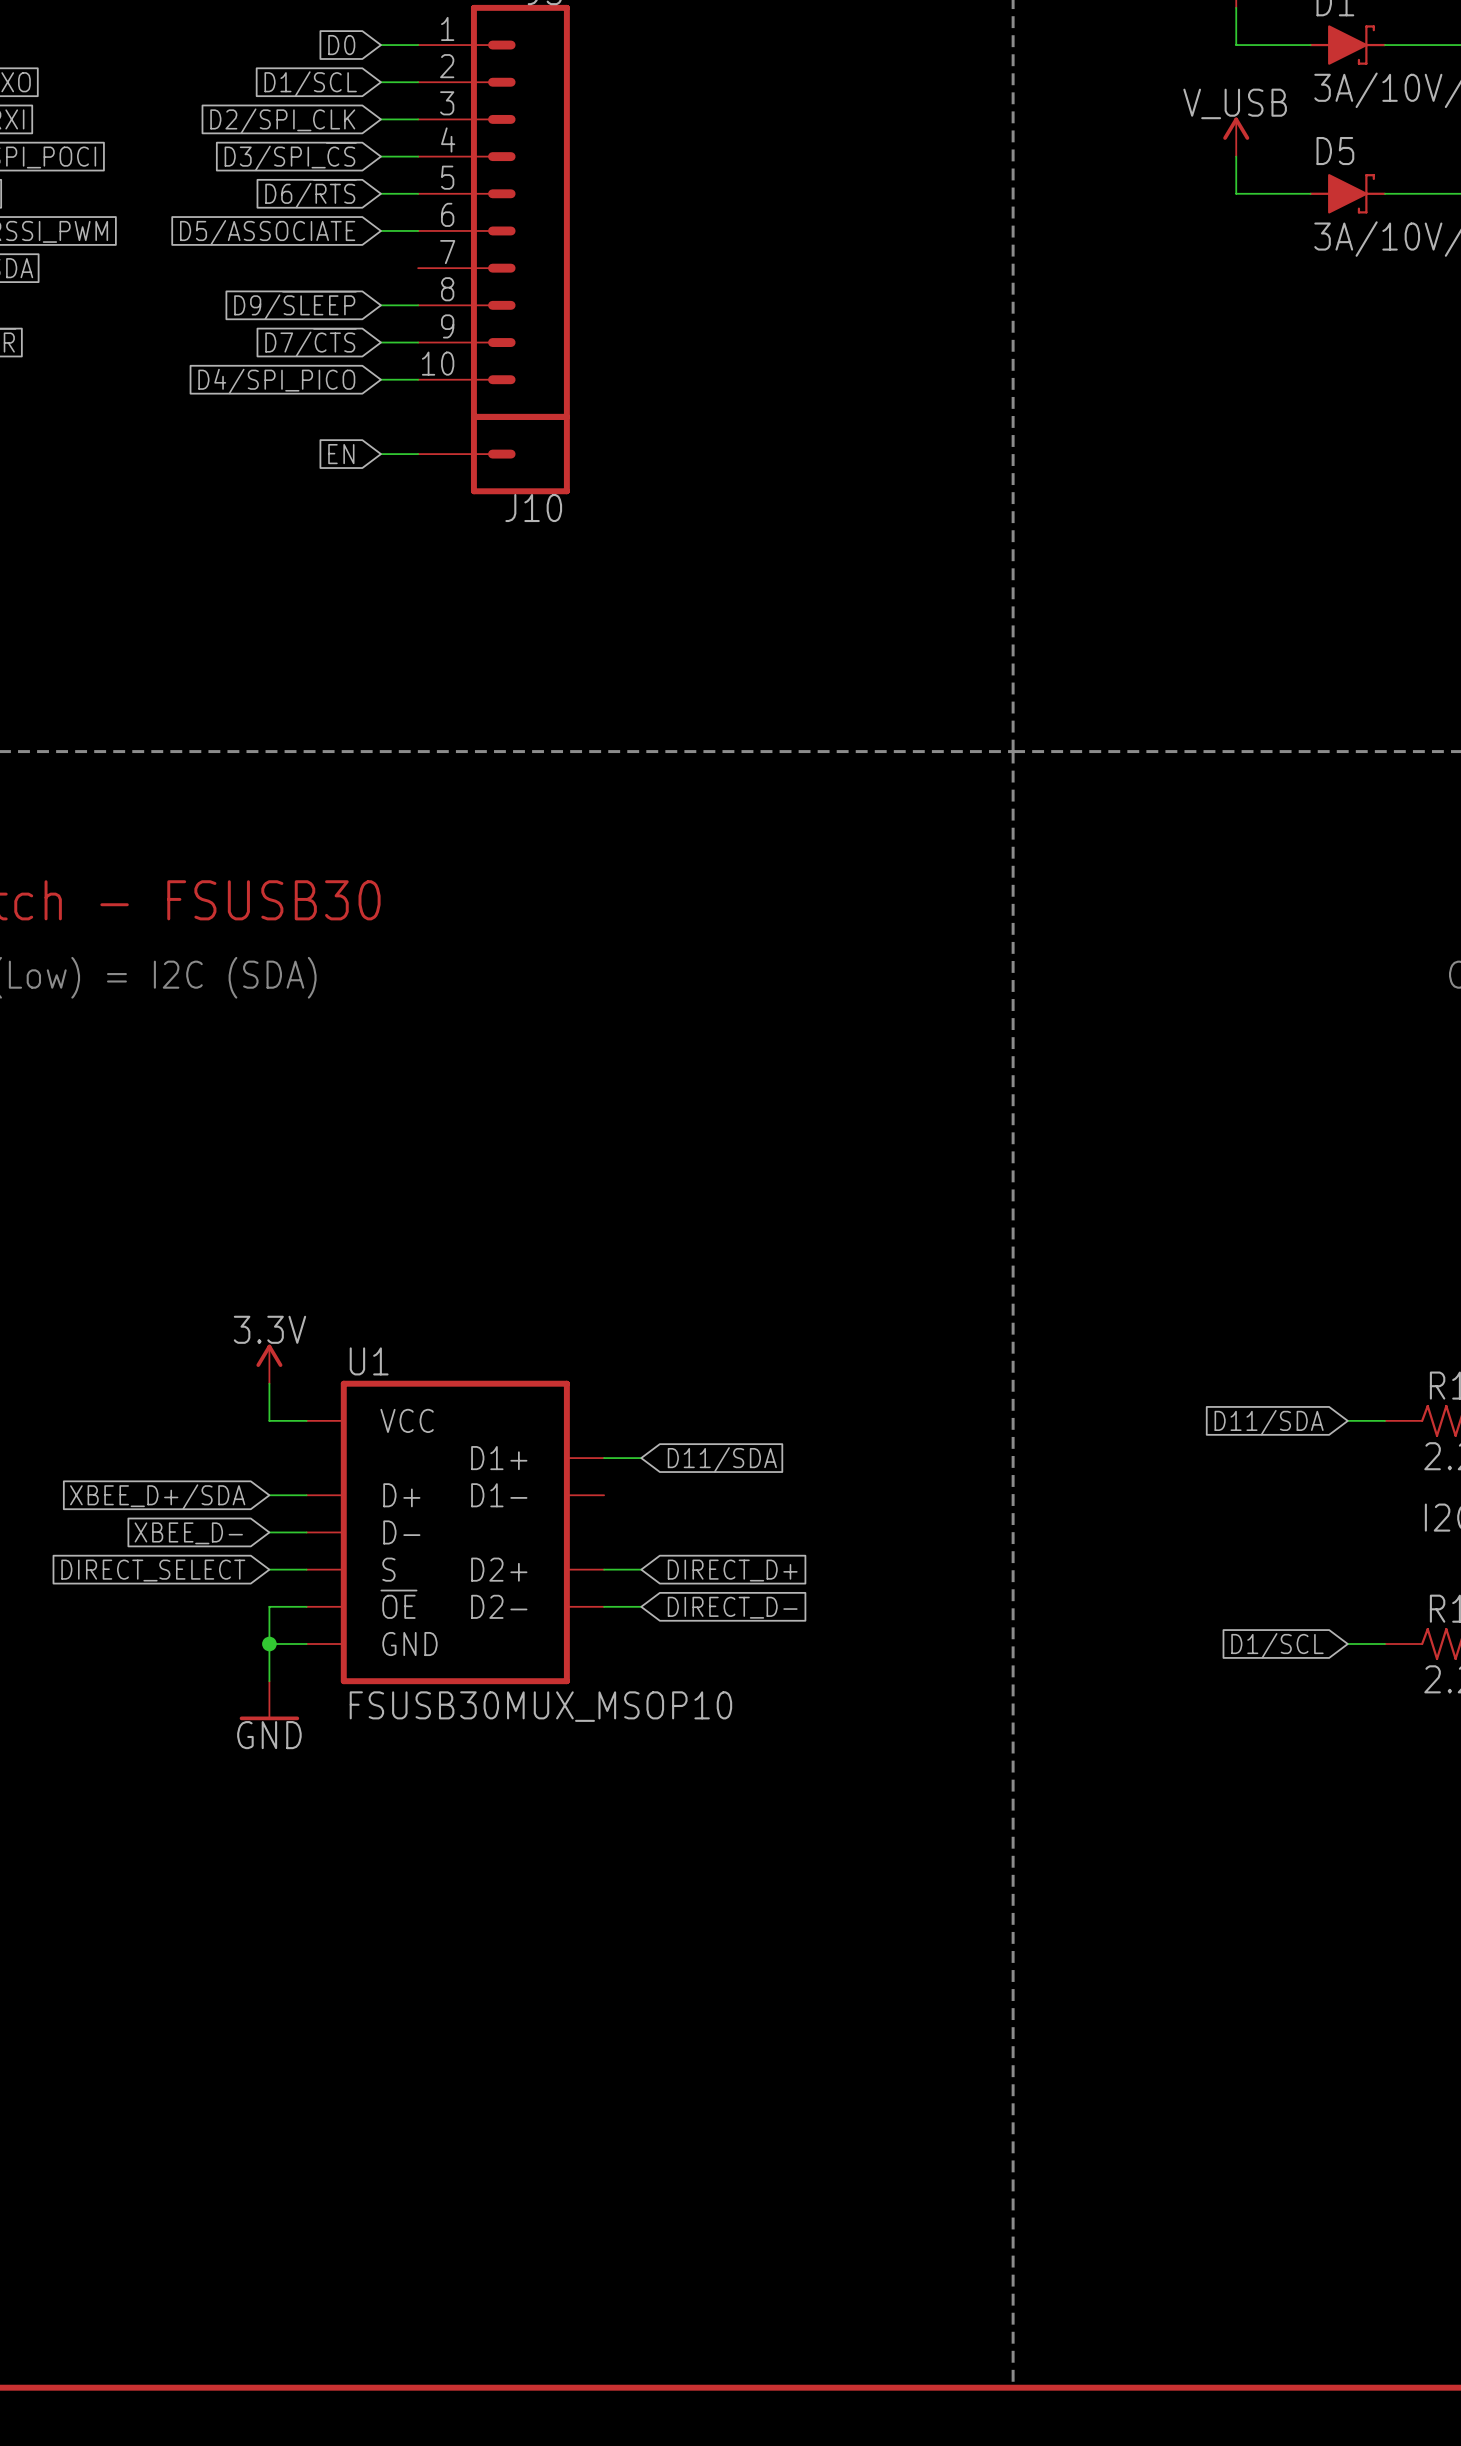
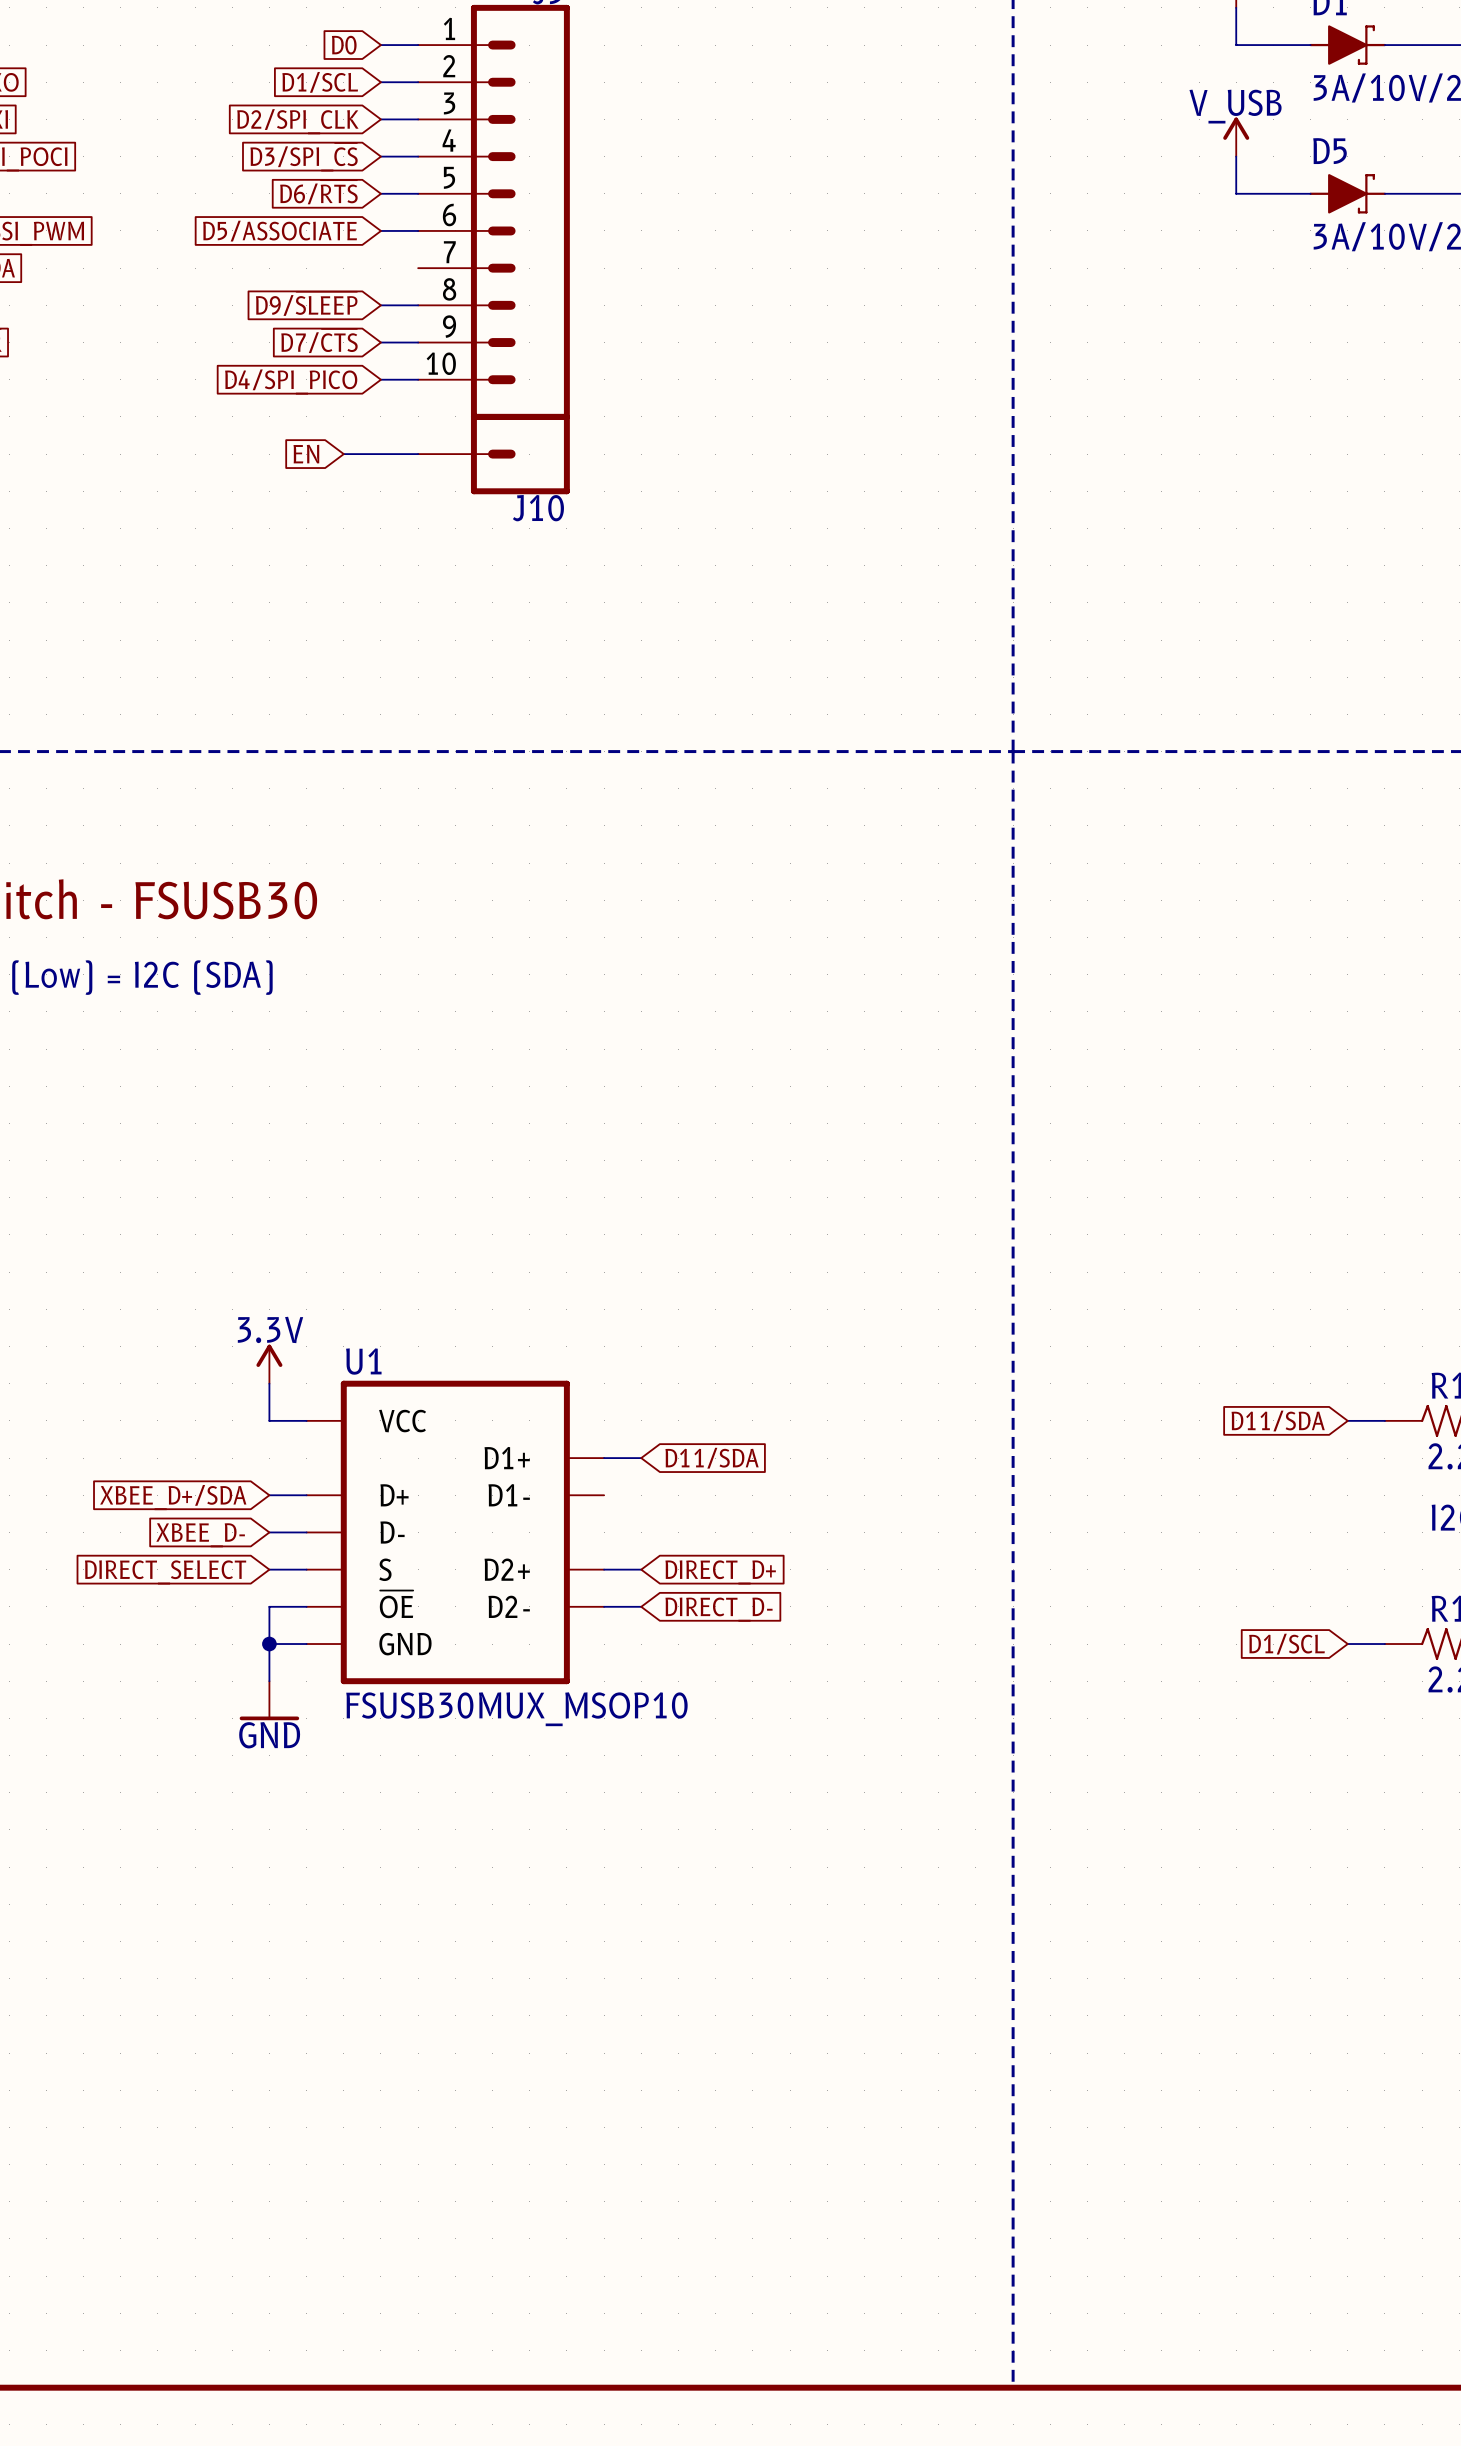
global label position: EN (341, 454) -> EN (306, 454)
wire: none -> (343, 454) (380, 454)

